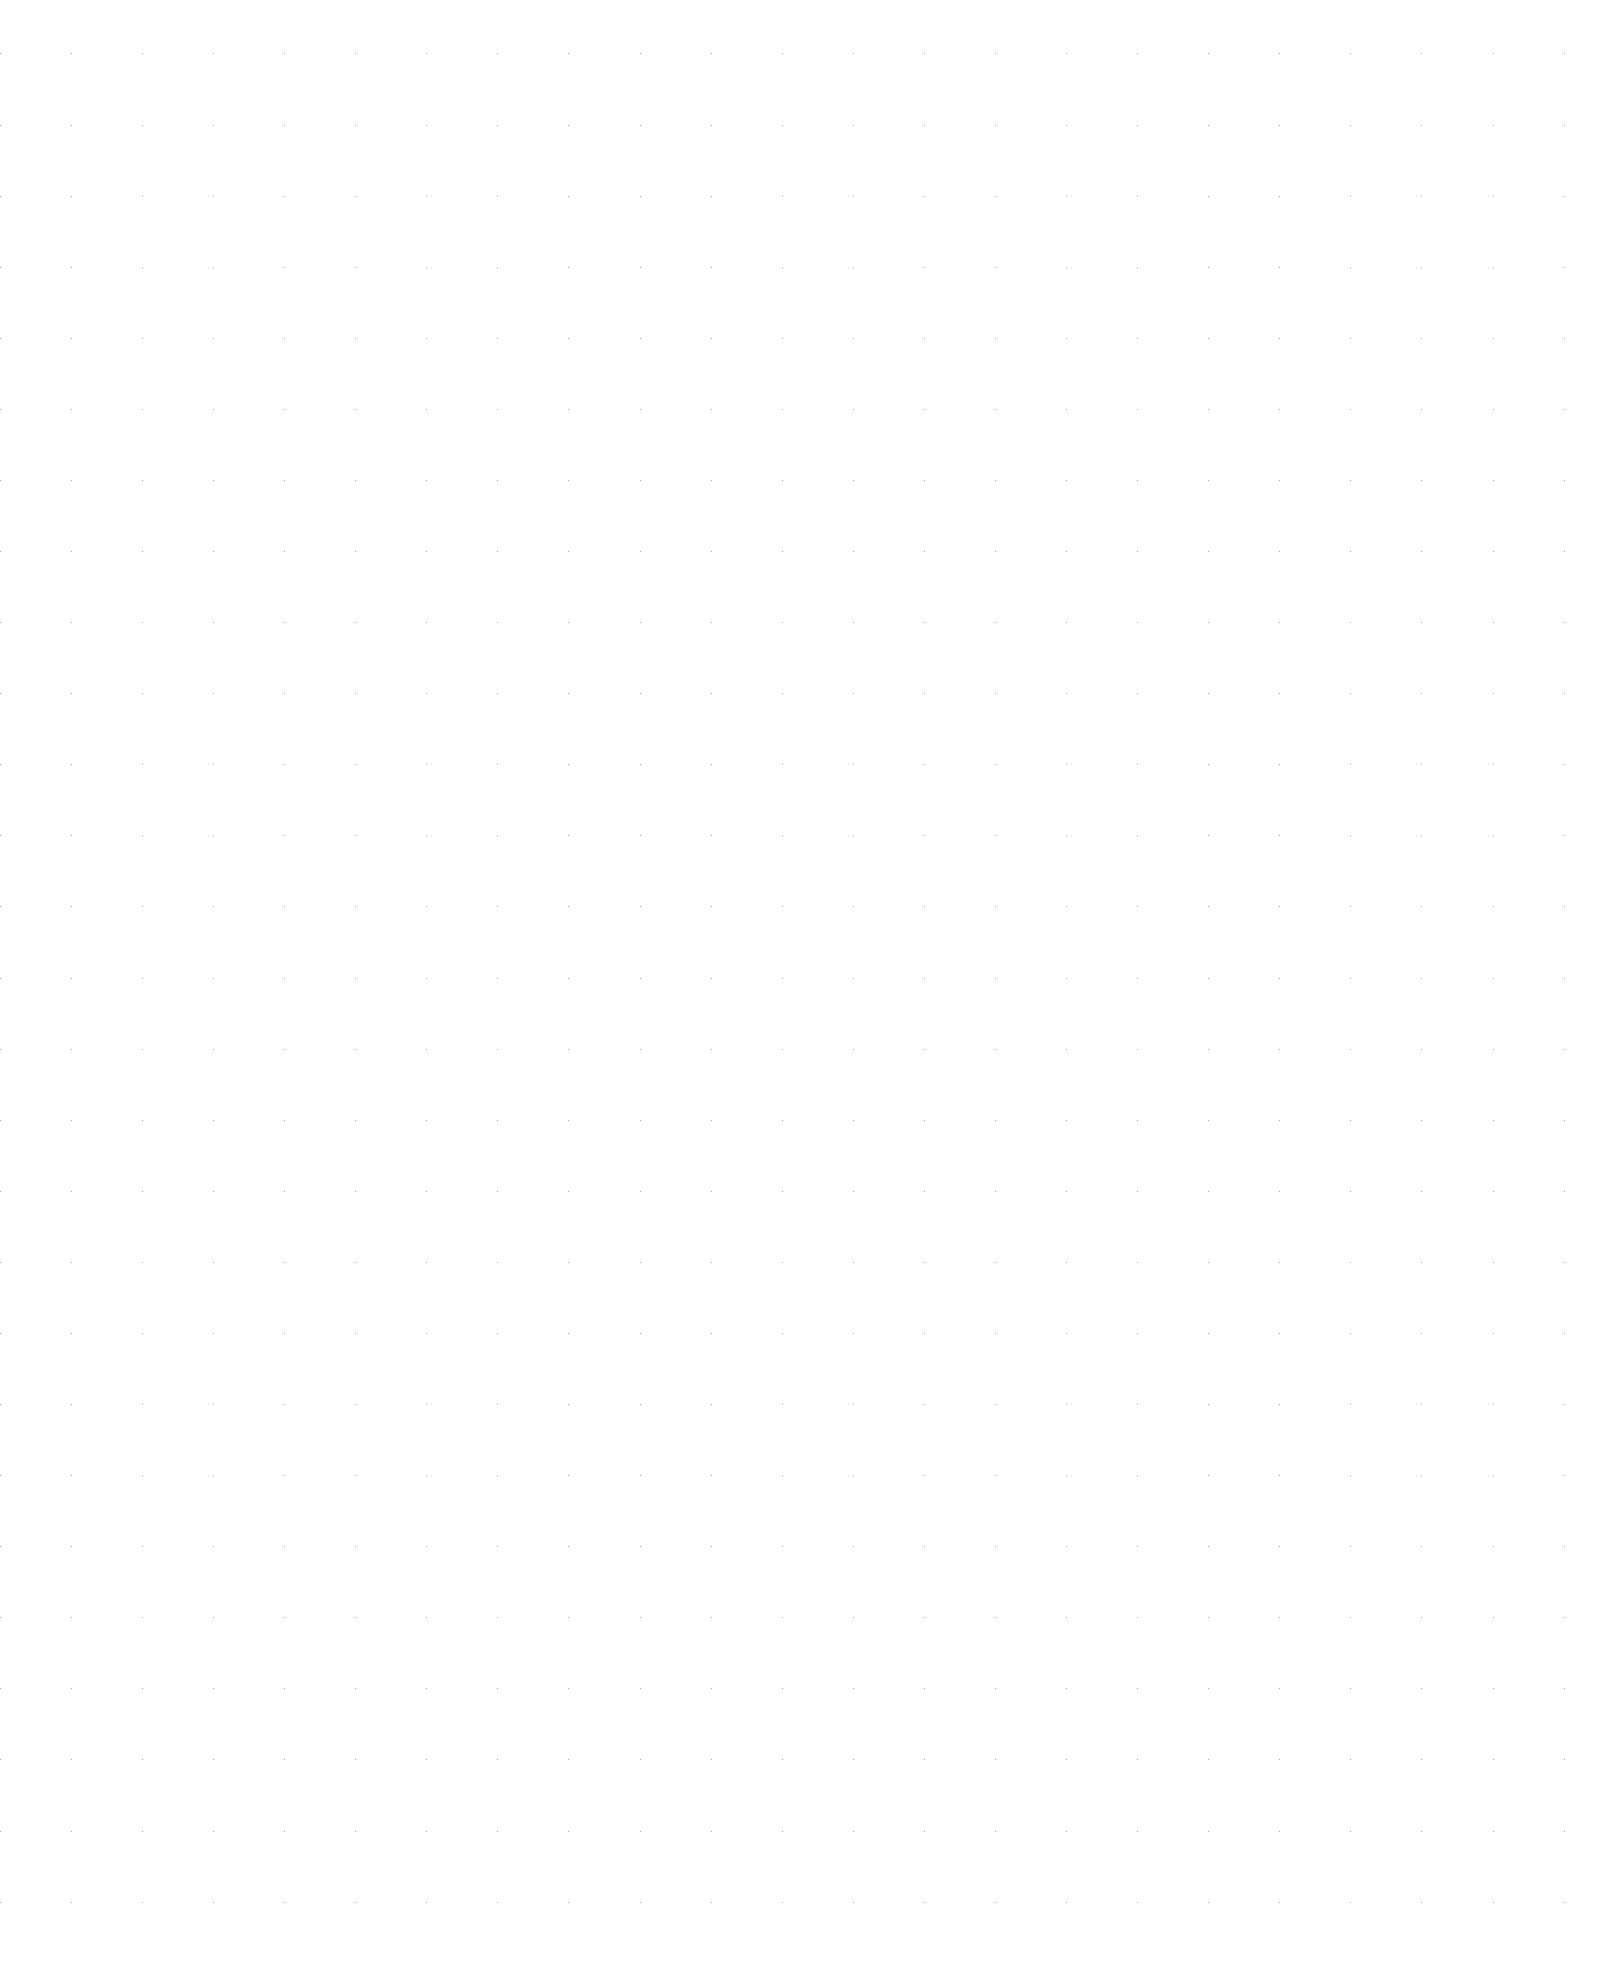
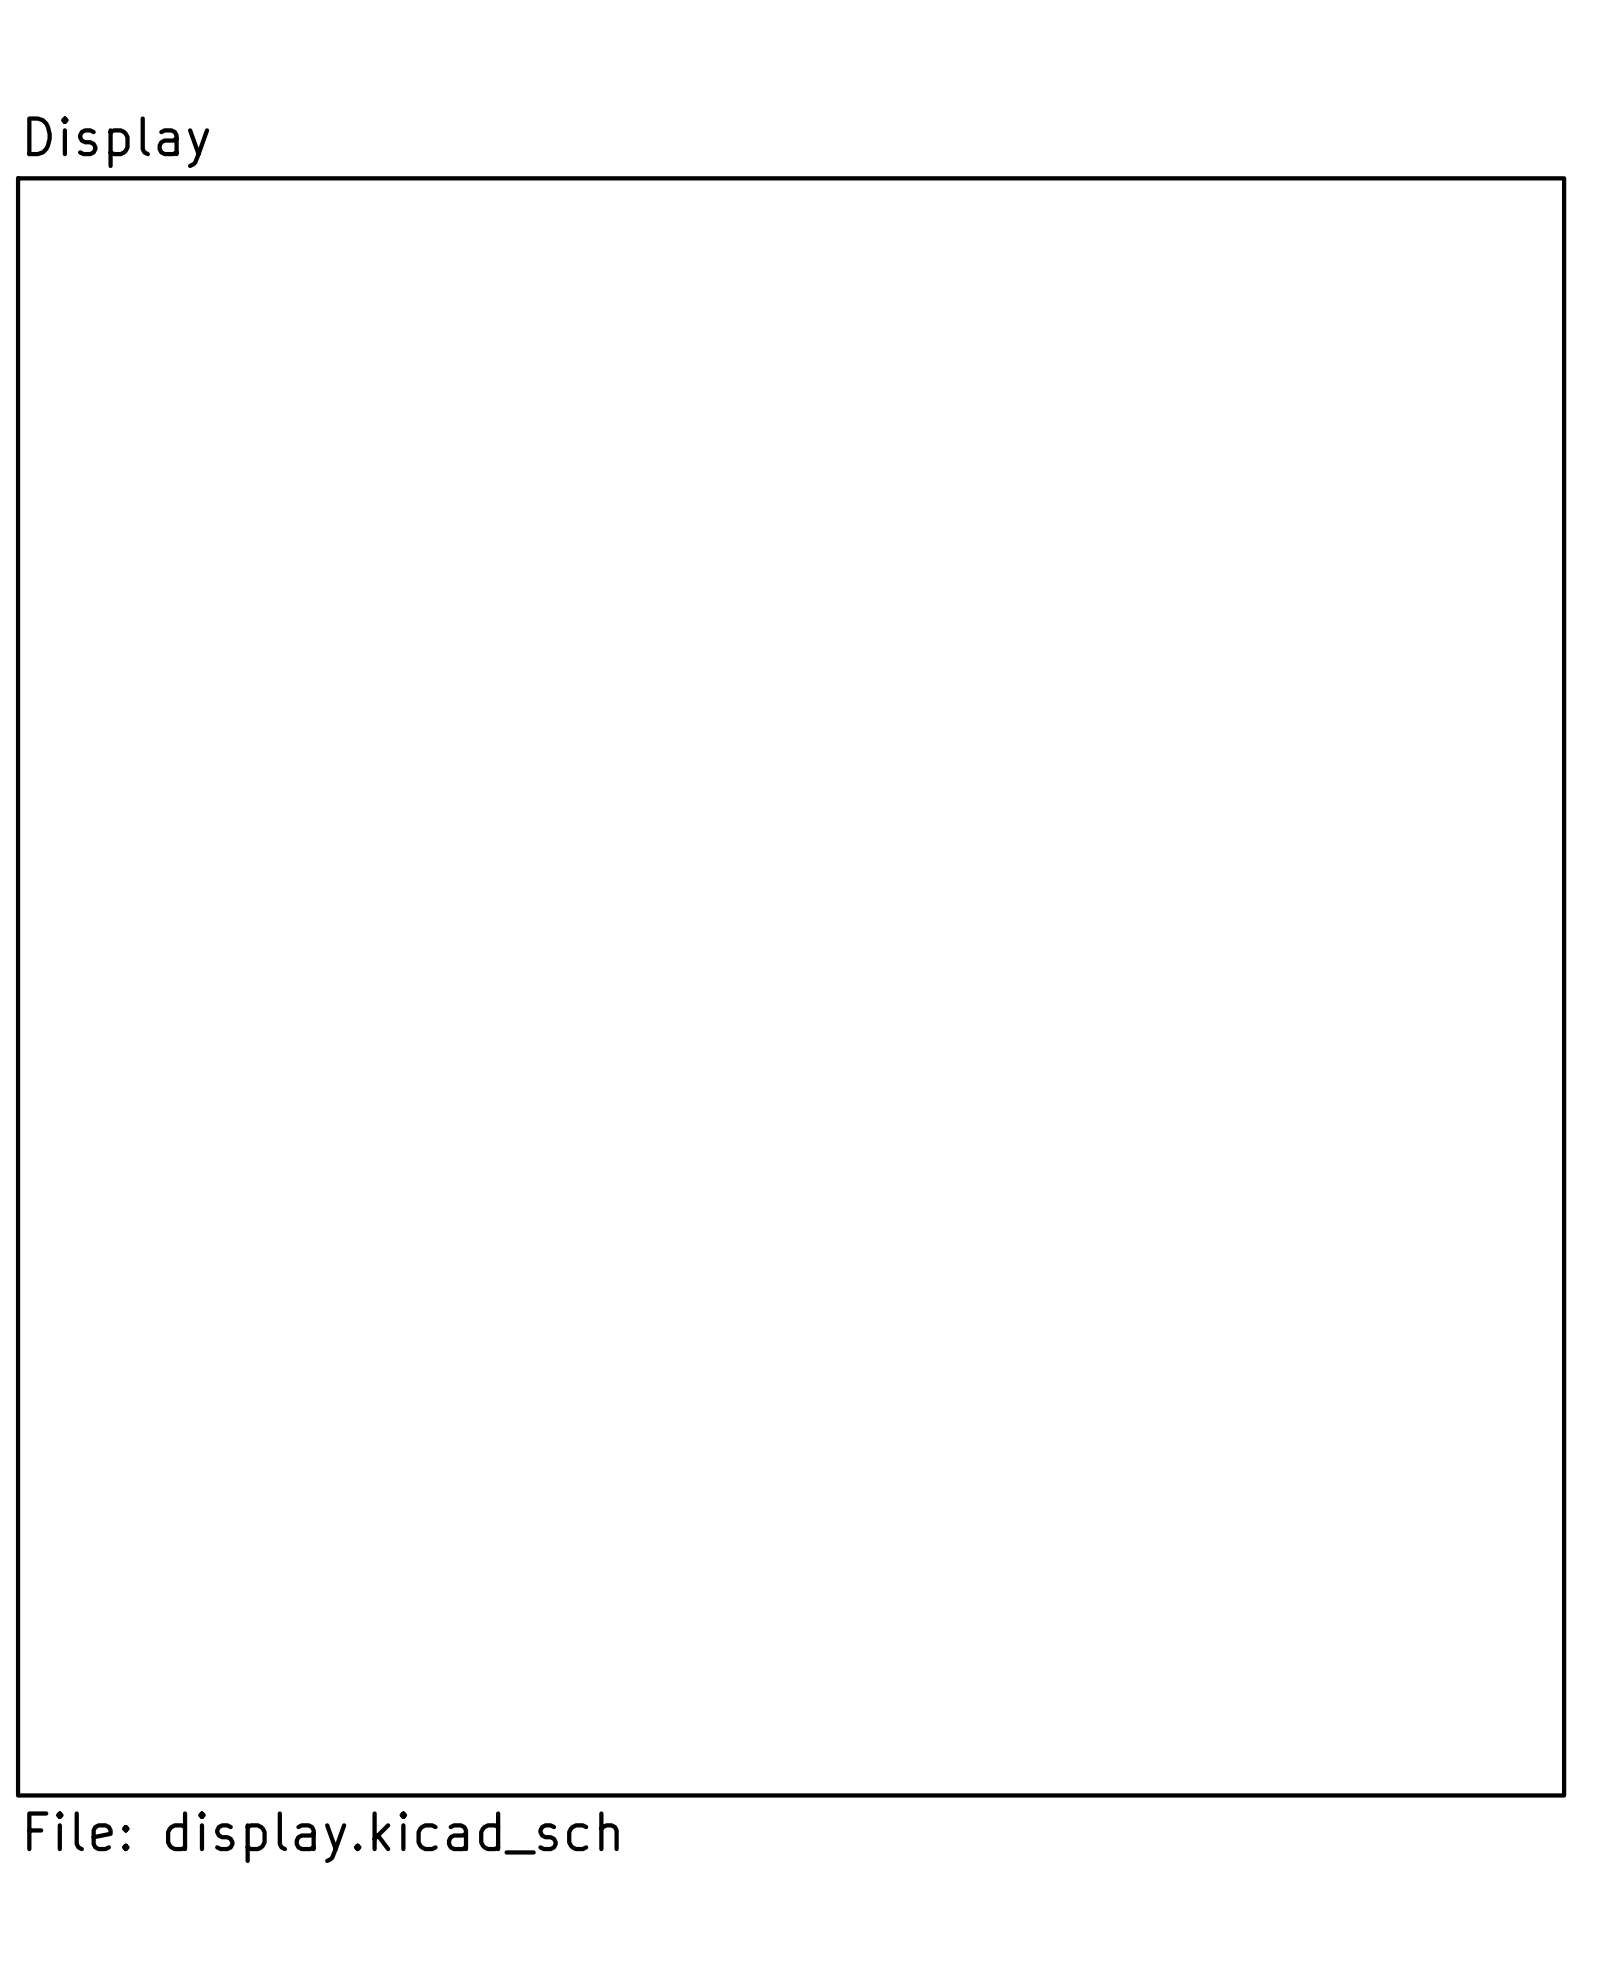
sheet Display: none -> File: display.kicad_sch (791, 986)

